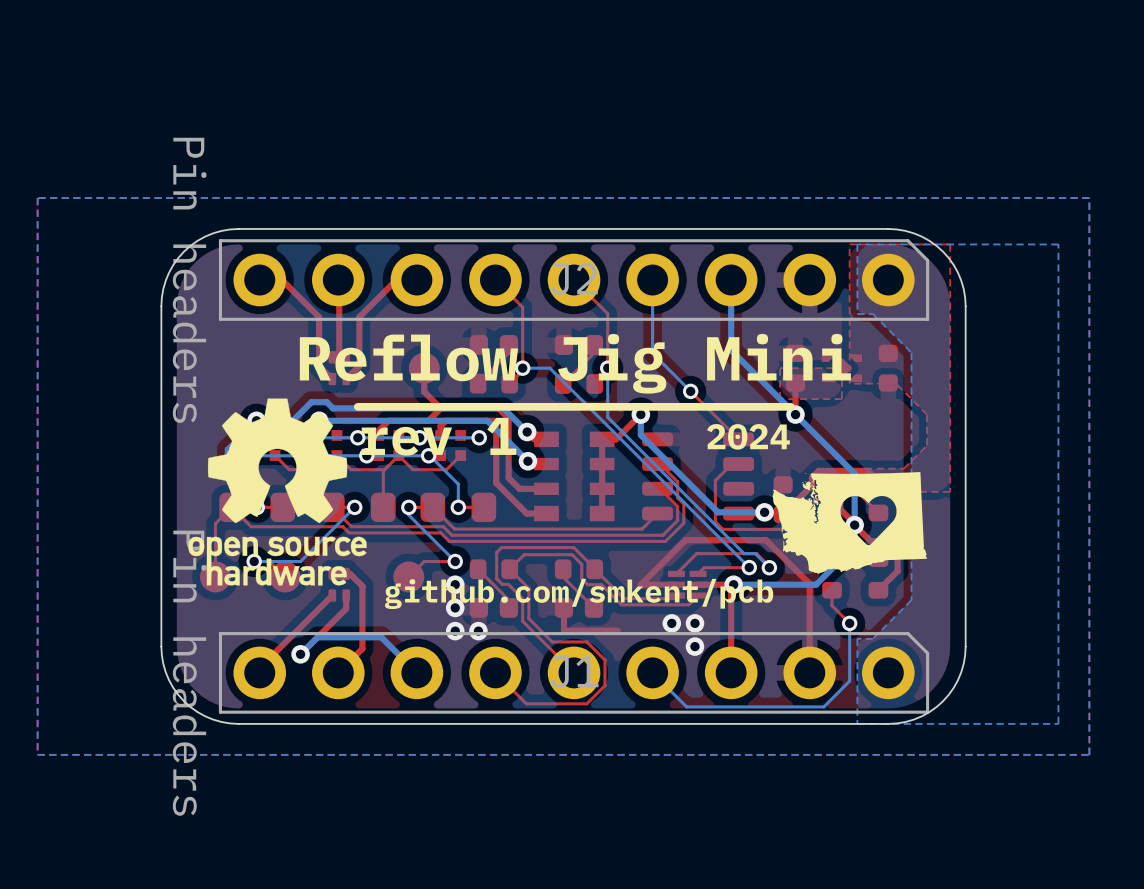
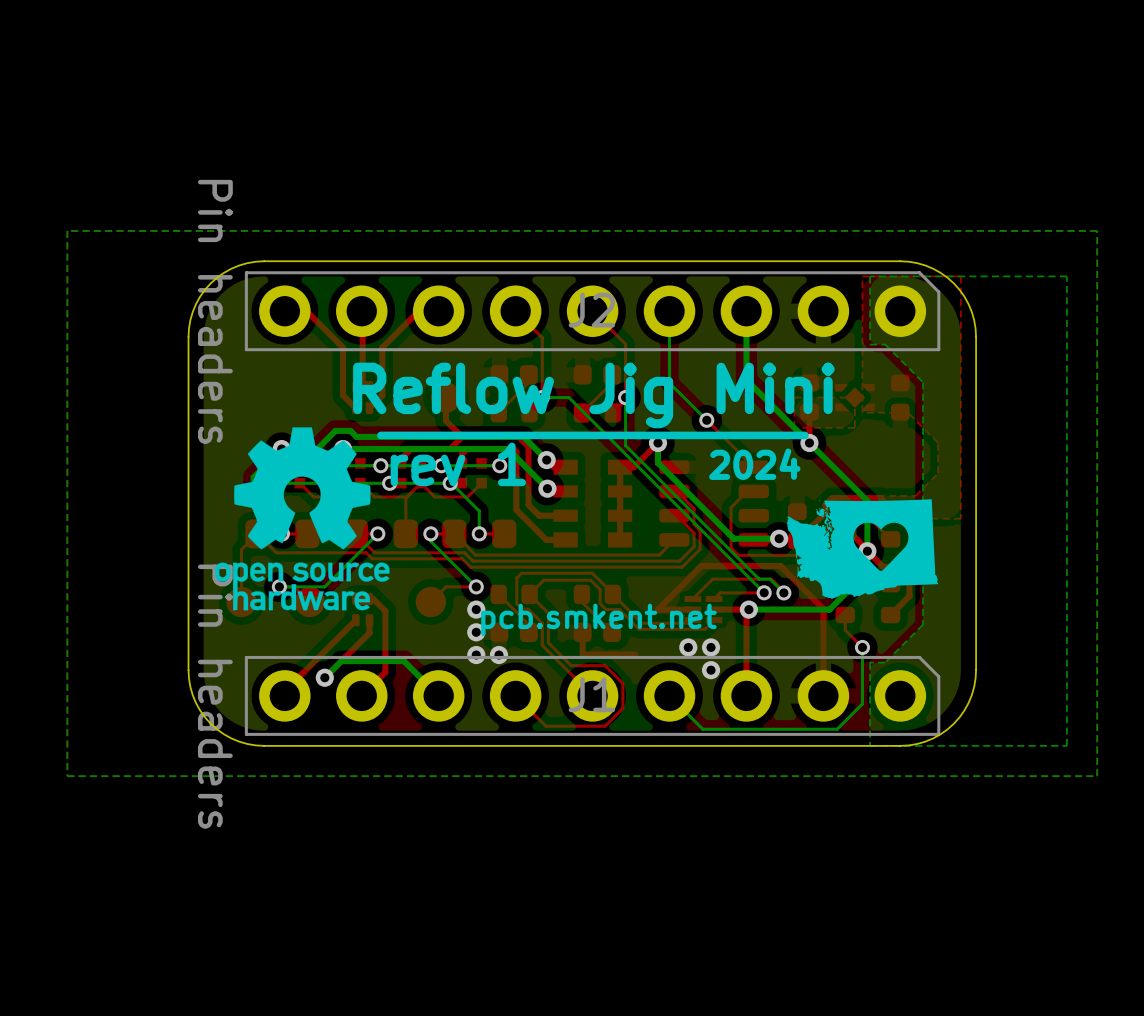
text: github.com/smkent/pcb (579, 593) -> pcb.smkent.net (598, 619)

